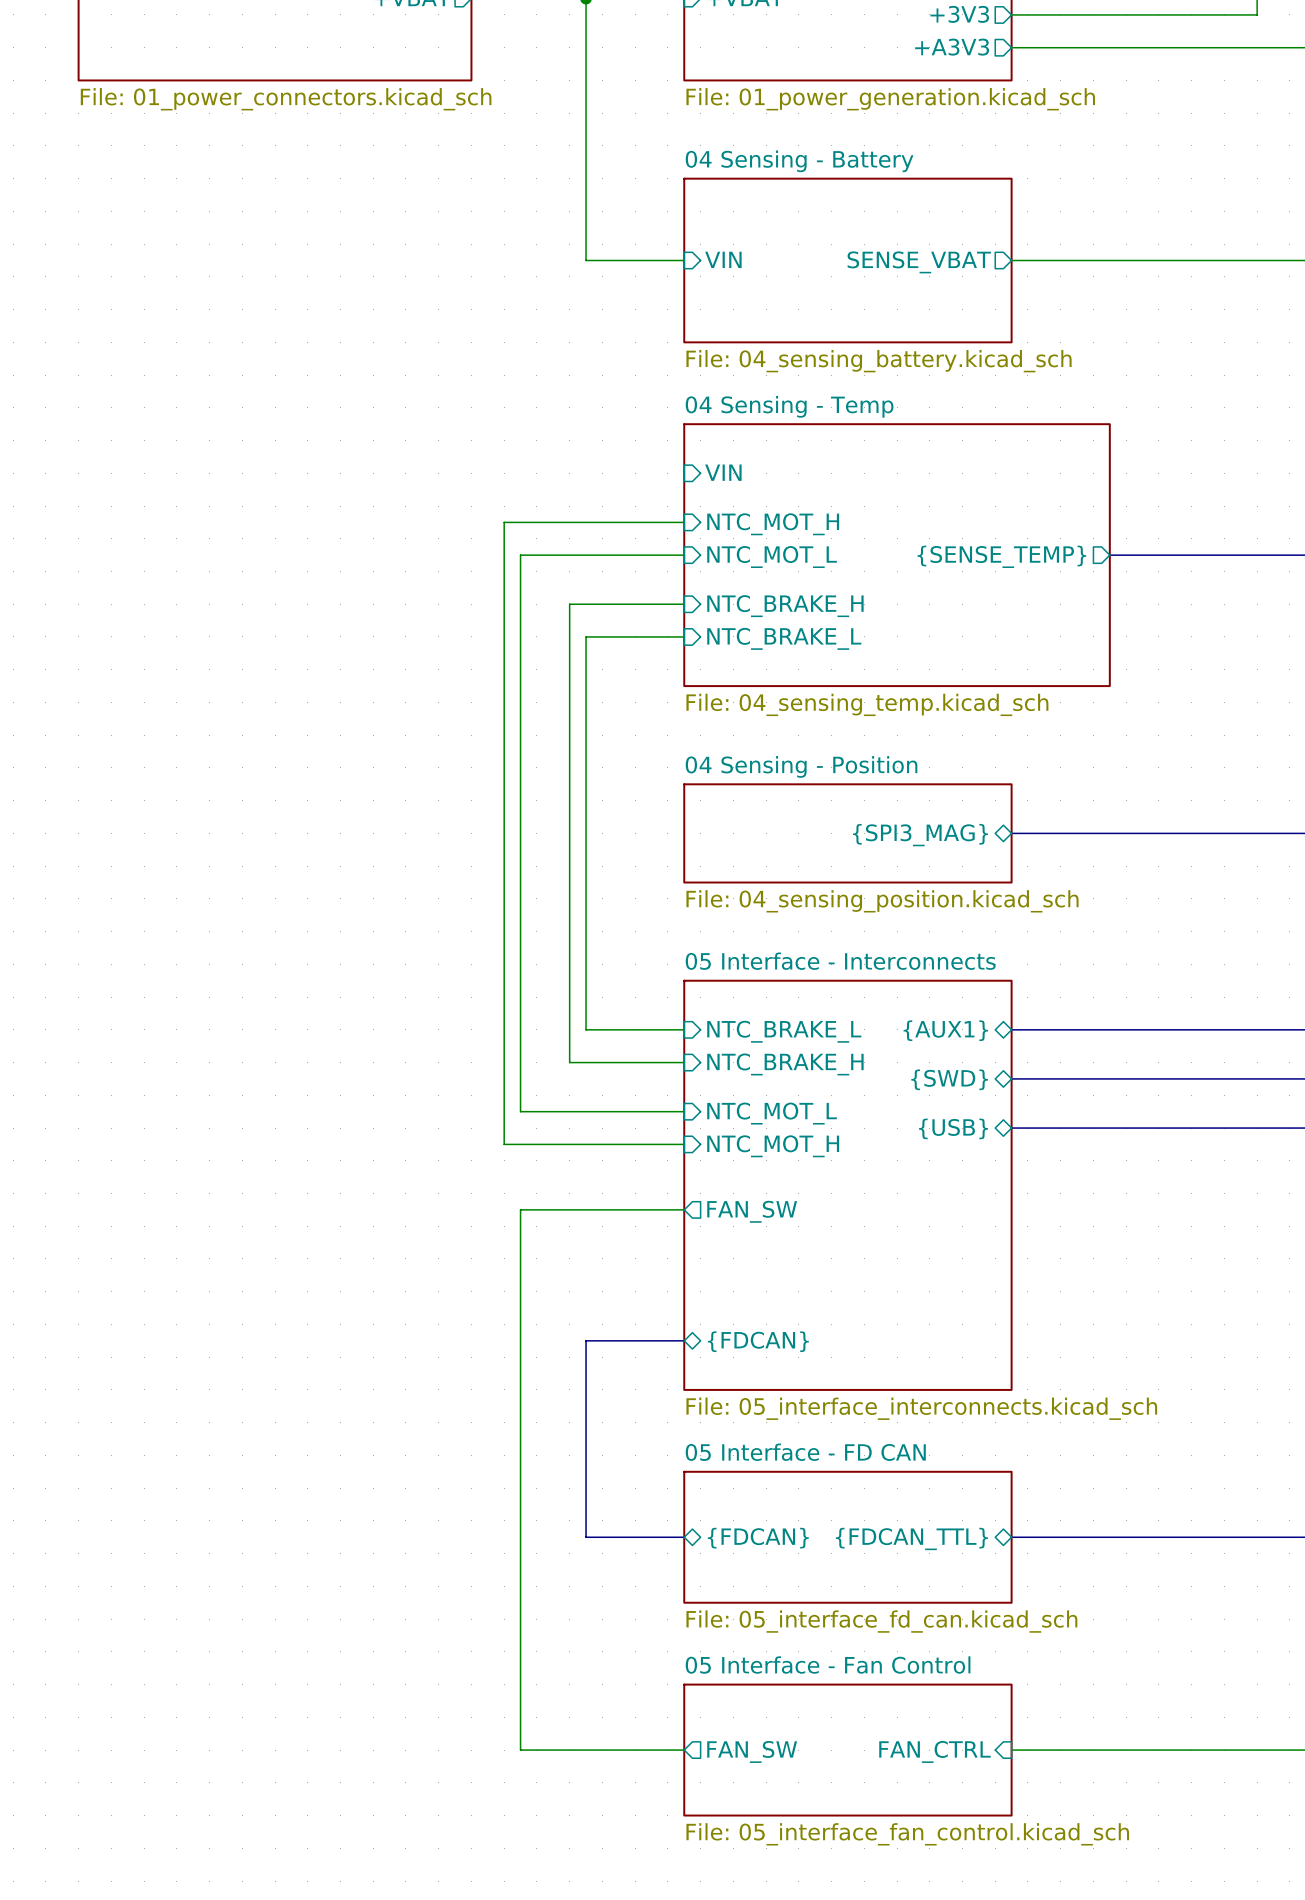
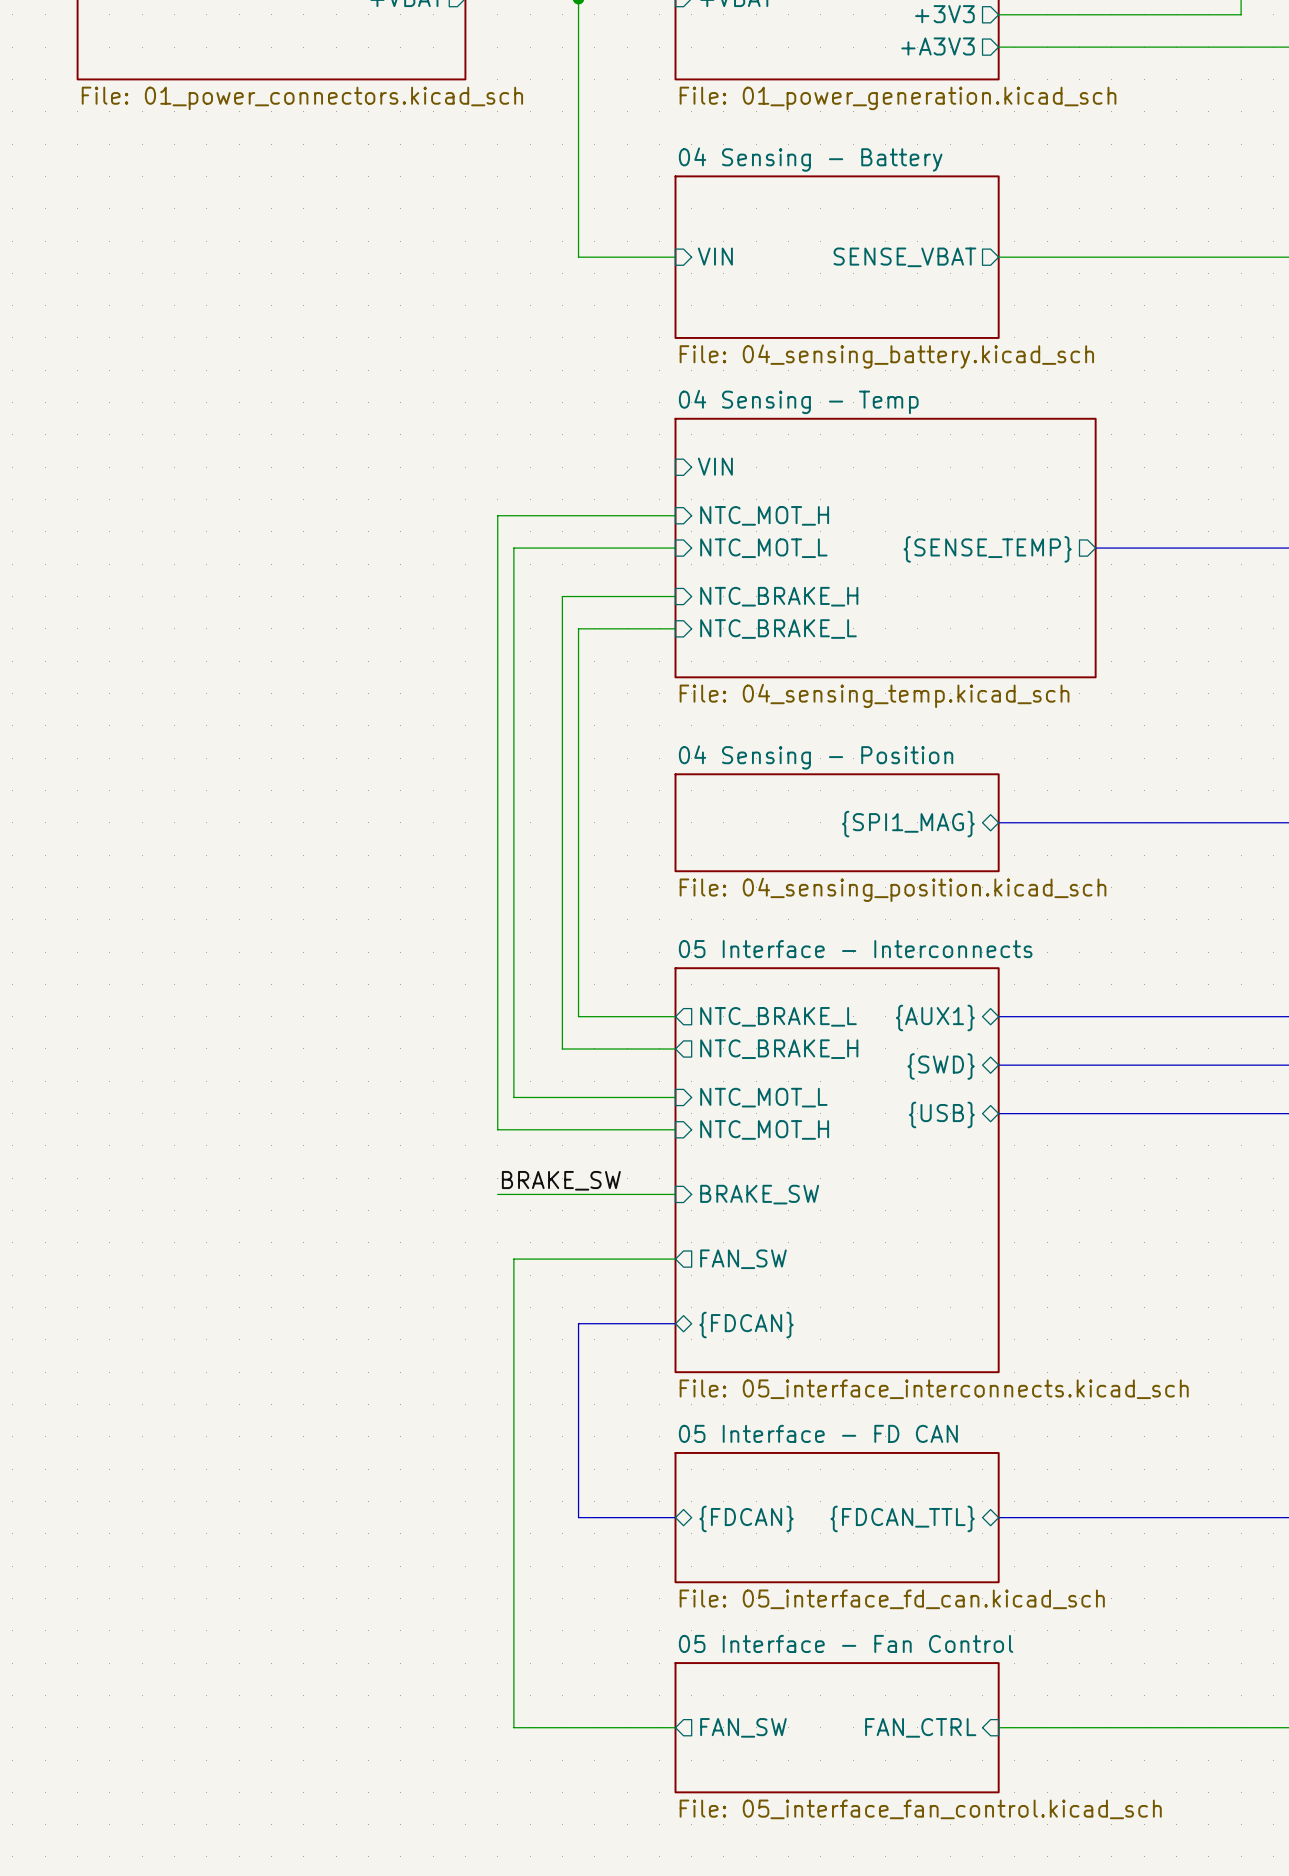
sheet pin: {SPI3_MAG} (920, 835) -> {SPI1_MAG} (908, 824)
sheet pin shape: input (784, 1031) -> output (778, 1016)
sheet pin shape: input (785, 1064) -> output (779, 1049)
label: none -> BRAKE_SW (561, 1180)
wire: (520, 1209) (520, 1275) -> (513, 1194) (497, 1194)
sheet pin shape: output (752, 1211) -> input (759, 1194)
sheet pin: FAN_SW (752, 1211) -> BRAKE_SW (759, 1194)
wire: none -> (513, 1259) (675, 1259)
sheet pin: none -> FAN_SW (743, 1259)

